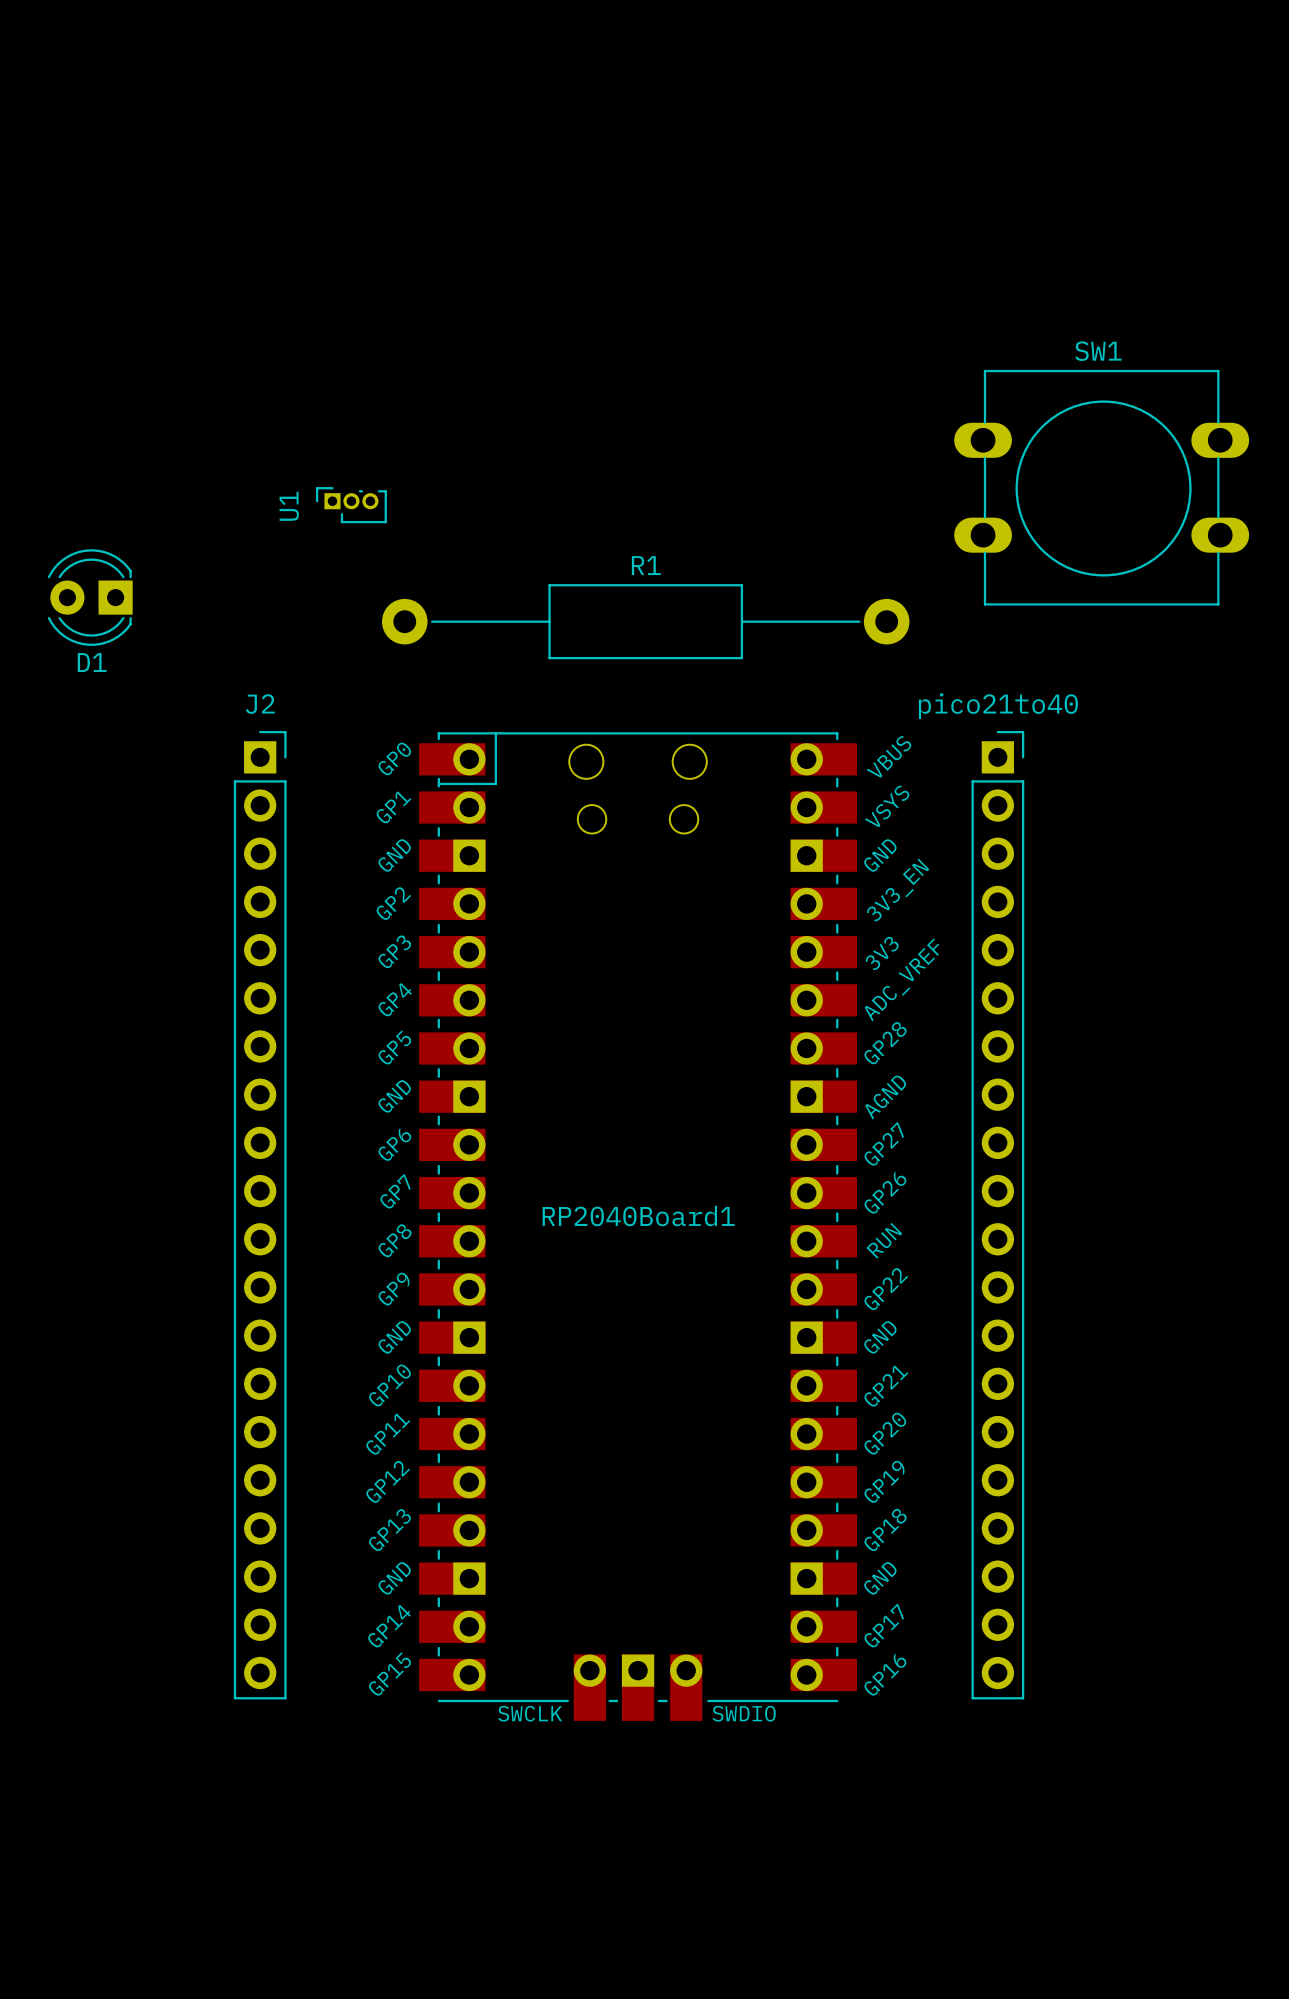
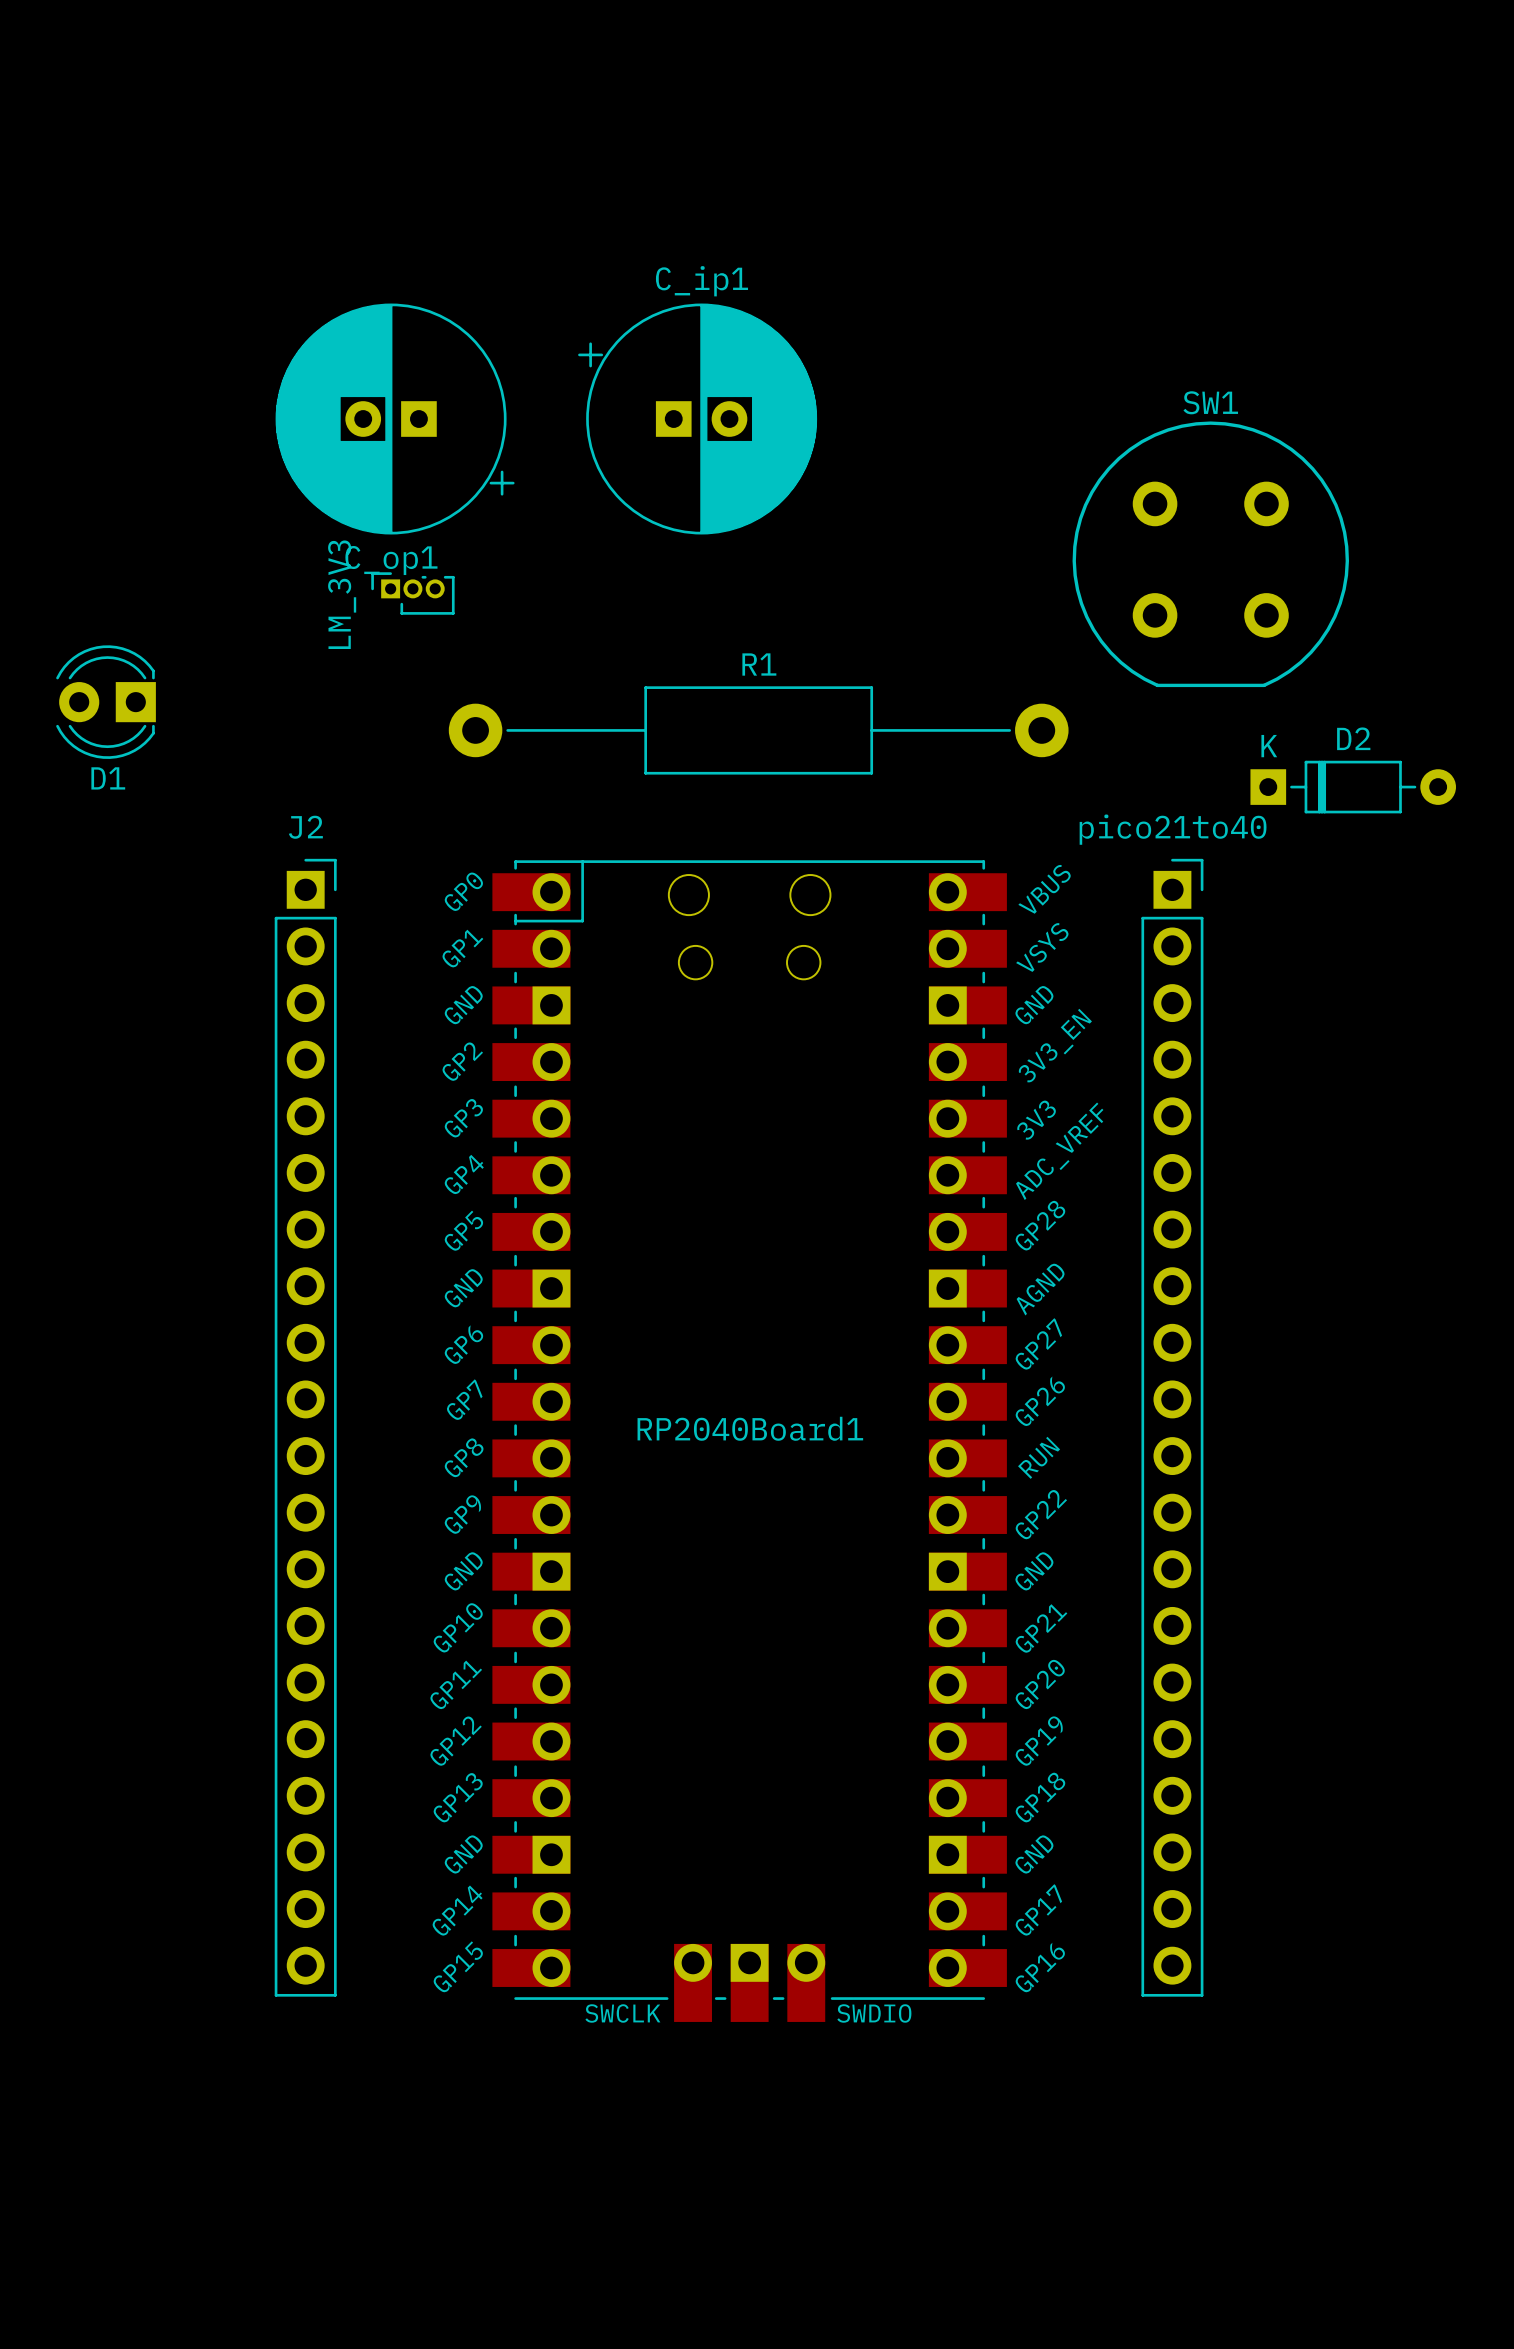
C_op1: none -> (395, 419)
C_ip1: none -> (697, 419)
SW1 footprint: [954, 369, 1250, 606] -> [1072, 421, 1349, 688]
U1 name: U1 (289, 506) -> LM_3V3 (342, 594)
D2: none -> (1353, 787)

